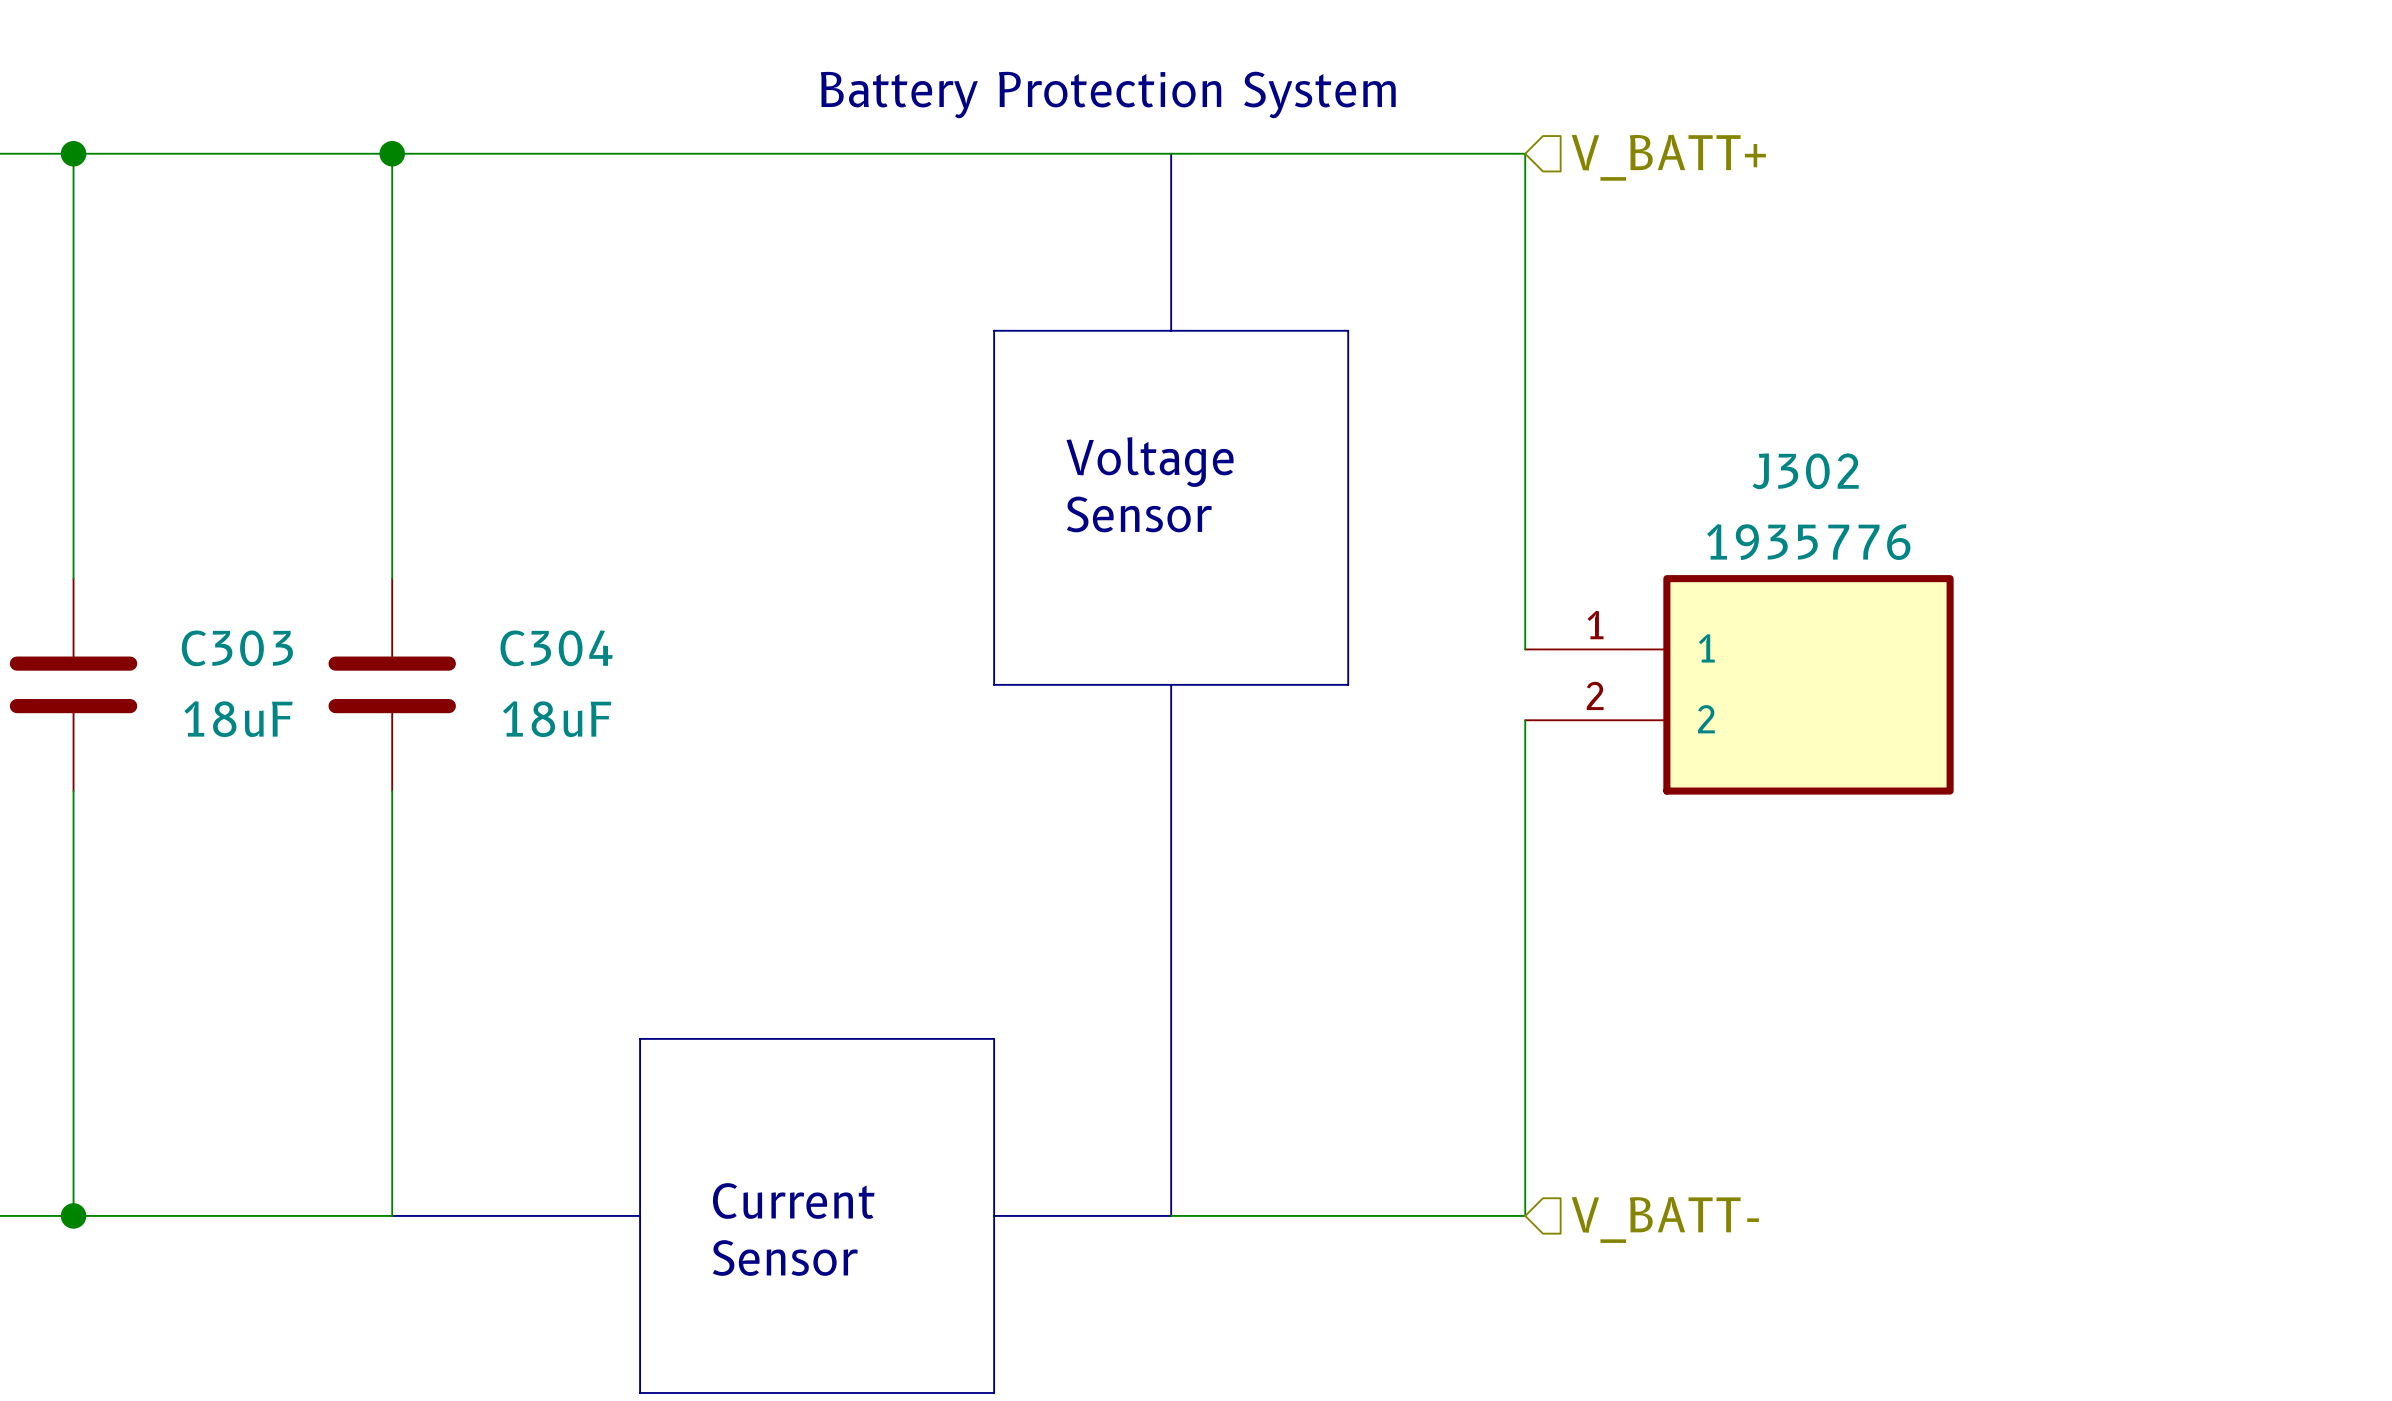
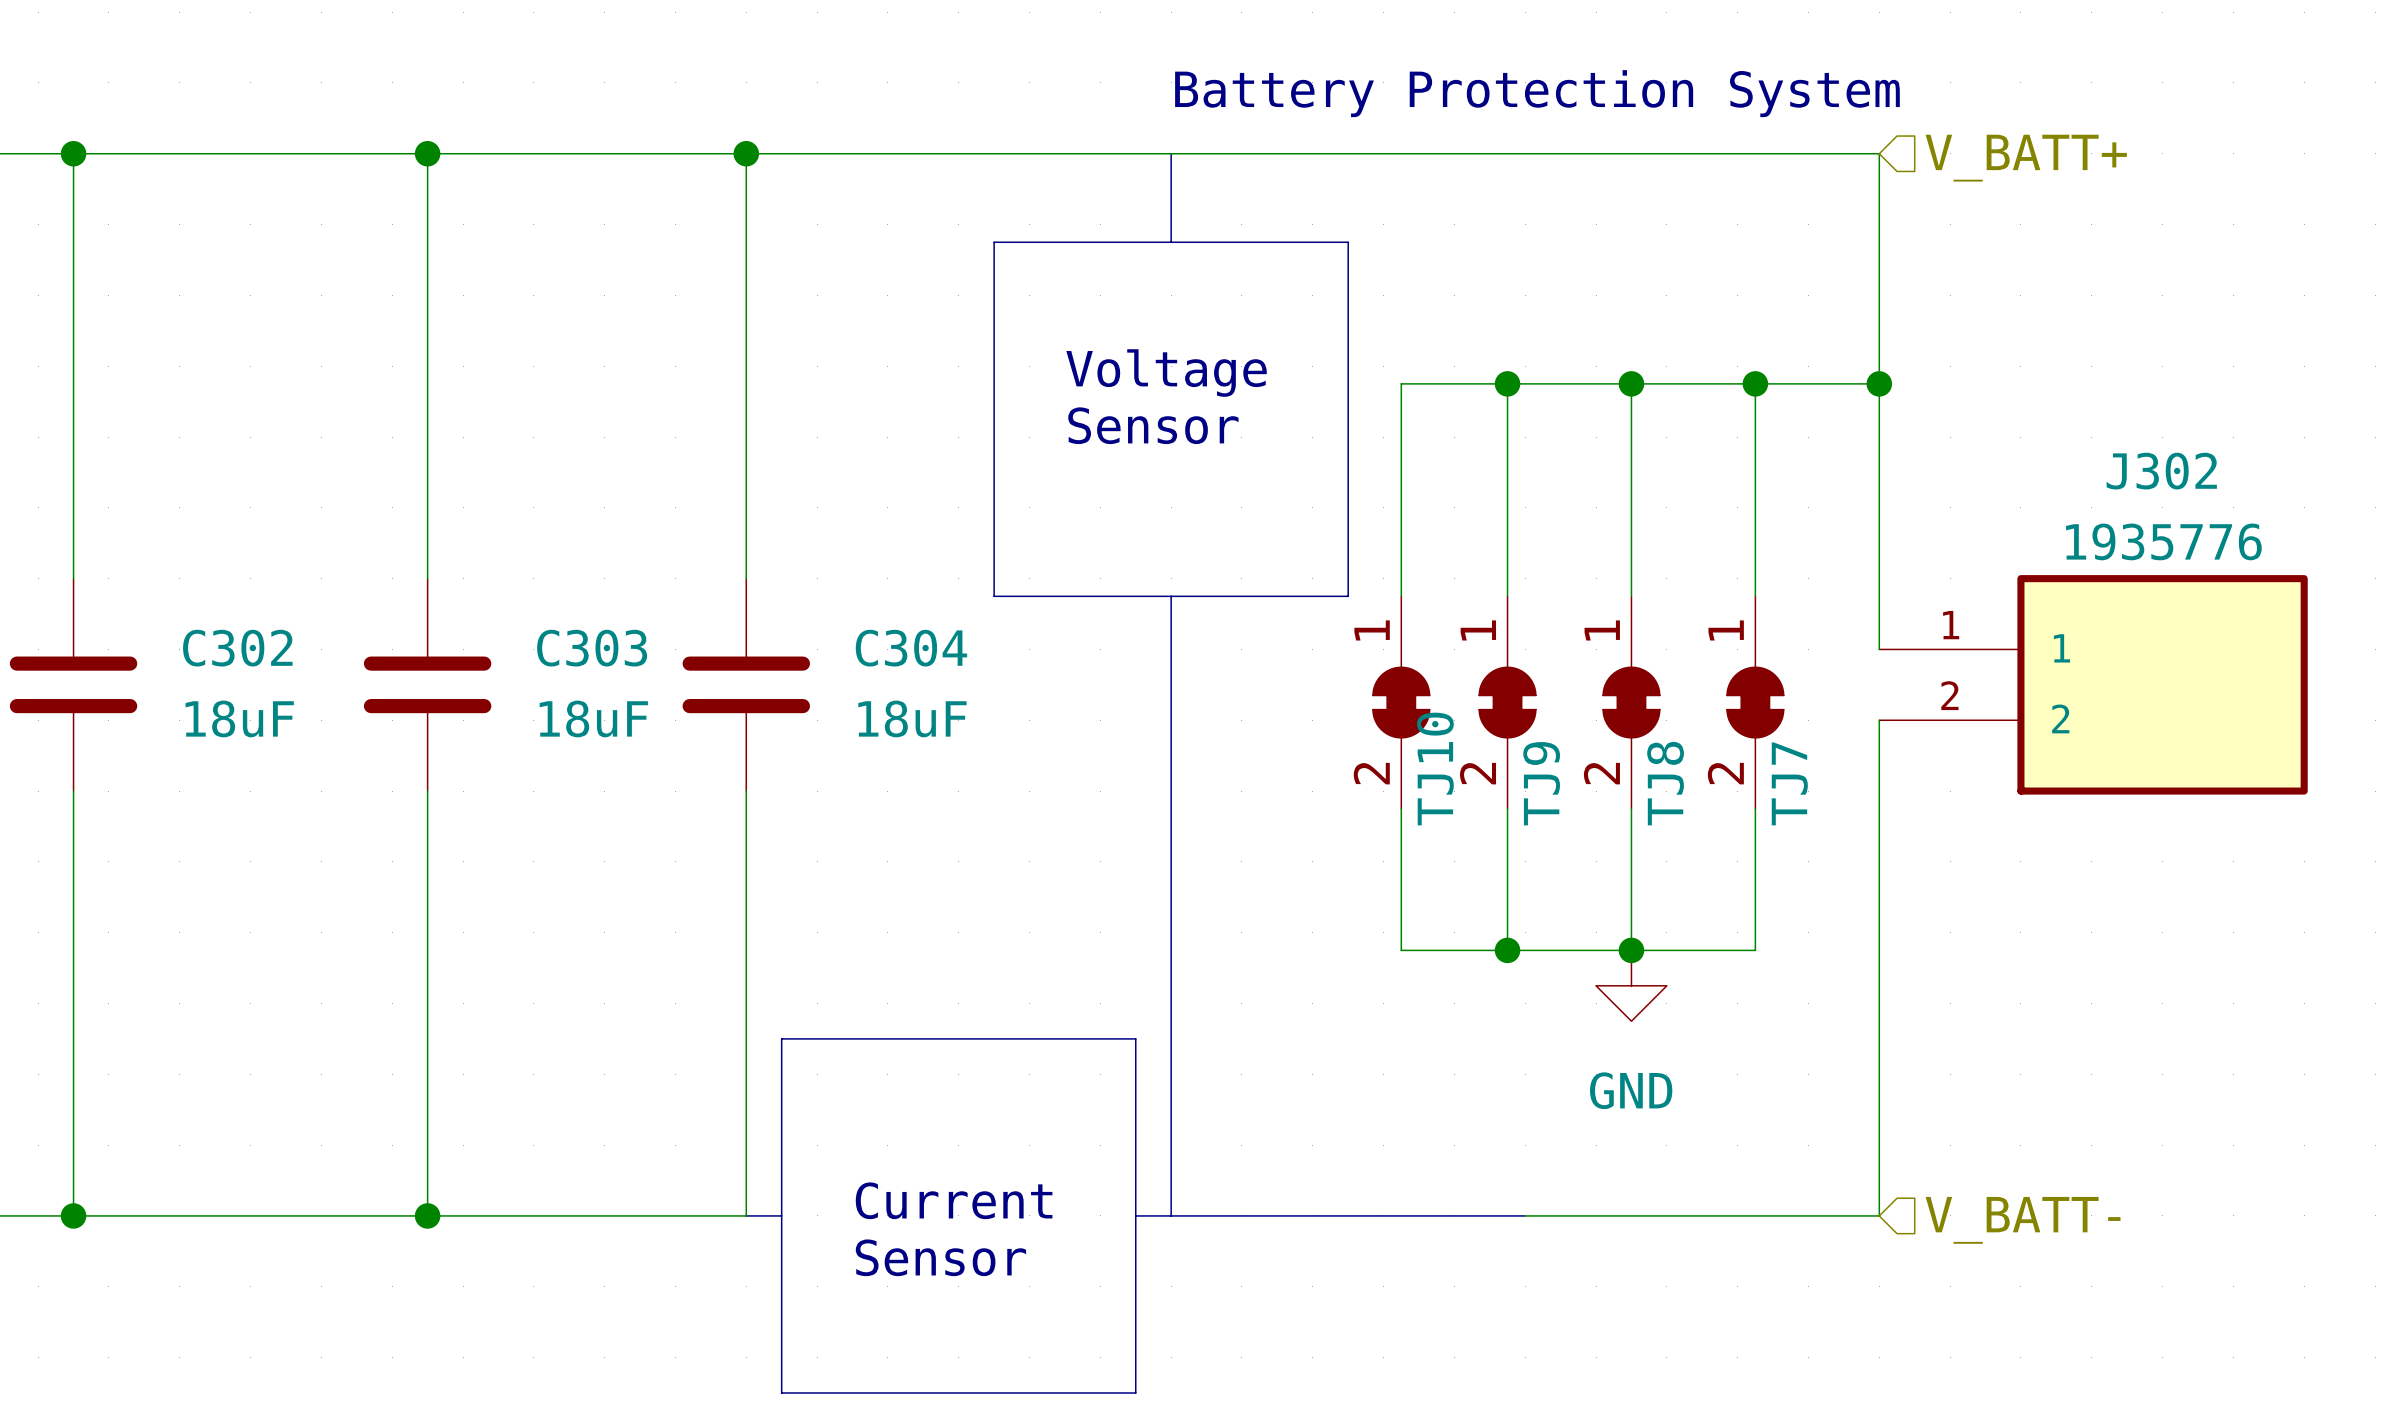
text position: Battery Protection System (1108, 94) -> Battery Protection System (1537, 93)
wire: (392, 153) (392, 578) -> (427, 153) (427, 578)
junction position: (392, 153) -> (427, 153)
wire: none -> (746, 153) (746, 578)
junction: none -> (746, 153)
wire: (1525, 153) (1525, 649) -> (1525, 153) (1879, 153) (1879, 649)
hierarchical label position: V_BATT+ (1668, 157) -> V_BATT+ (2026, 158)
line: (1171, 242) (1171, 330) -> (1171, 596) (1171, 684)
line: (994, 330) (1348, 330) -> (994, 330) (994, 242) (1348, 242) (1348, 330)
wire: none -> (1507, 383) (1507, 596)
junction: none -> (1507, 383)
wire: none -> (1631, 383) (1631, 596)
junction: none -> (1631, 383)
wire: none -> (1755, 383) (1755, 596)
junction: none -> (1755, 383)
wire: none -> (1879, 383) (1401, 383) (1401, 596)
junction: none -> (1879, 383)
text position: Voltage (1150, 462) -> Voltage (1166, 373)
text position: Sensor (1139, 514) -> Sensor (1153, 425)
line: (994, 596) (994, 684) (1348, 684) (1348, 596) -> (994, 596) (1348, 596)
C303 name: C303 (237, 648) -> C302 (237, 648)
C304 position: (392, 684) -> (746, 684)
C303: none -> 18uF (427, 684)
J302 position: (1739, 684) -> (2093, 684)
TJ10: none -> (1401, 702)
TJ9: none -> (1507, 702)
TJ8: none -> (1631, 702)
TJ7: none -> (1755, 702)
wire: (1525, 720) (1525, 1215) (1171, 1215) -> (1879, 720) (1879, 1215) (1525, 1215)
wire: (392, 791) (392, 1215) -> (746, 791) (746, 1215) (392, 1215)
wire: none -> (427, 791) (427, 1215)
wire: none -> (1401, 808) (1401, 950) (1755, 950) (1755, 808)
wire: none -> (1507, 808) (1507, 950)
wire: none -> (1631, 808) (1631, 950)
junction: none -> (1507, 950)
junction: none -> (1631, 950)
power symbol: none -> GND (1631, 985)
line: (781, 1038) (640, 1038) (640, 1392) (781, 1392) -> (781, 1038) (781, 1392)
line: (994, 1038) (994, 1392) -> (994, 1038) (1135, 1038) (1135, 1392) (994, 1392)
text position: Current (793, 1200) -> Current (954, 1200)
line: (392, 1215) (640, 1215) -> none
junction: none -> (427, 1215)
line: none -> (746, 1215) (781, 1215)
line: (994, 1215) (1135, 1215) -> none
line: none -> (1171, 1215) (1525, 1215)
hierarchical label position: V_BATT- (1665, 1219) -> V_BATT- (2023, 1220)
text position: Sensor (785, 1257) -> Sensor (940, 1257)

